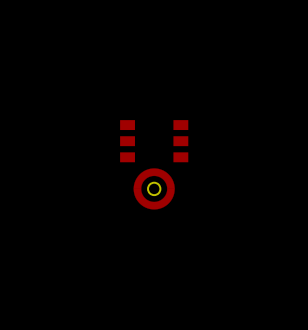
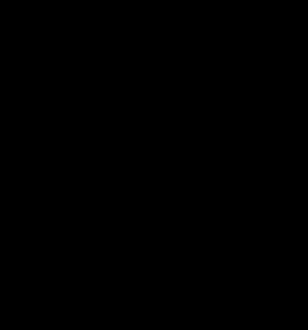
part: (154, 164) -> none

